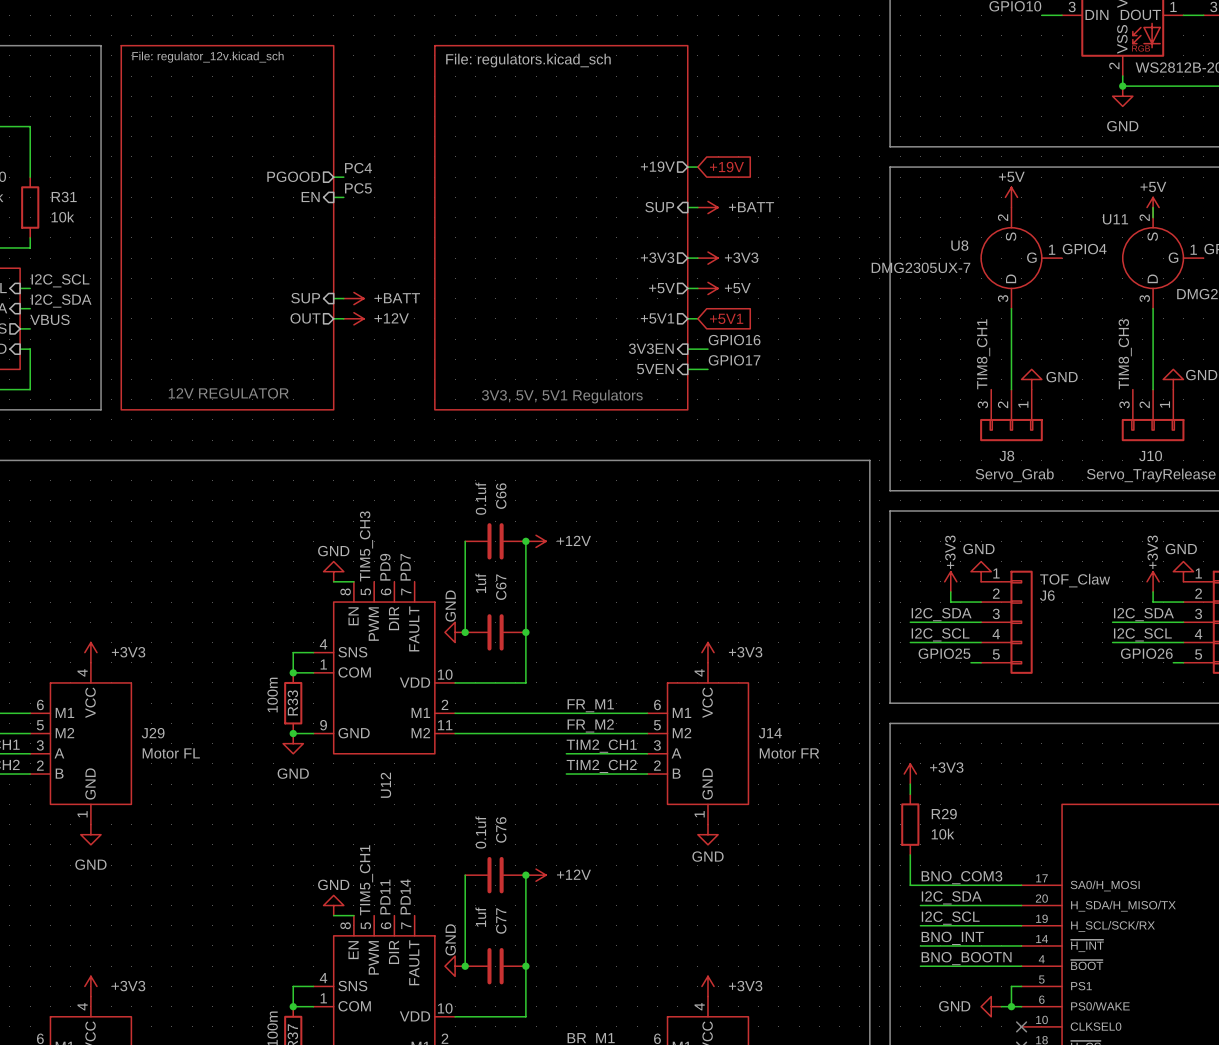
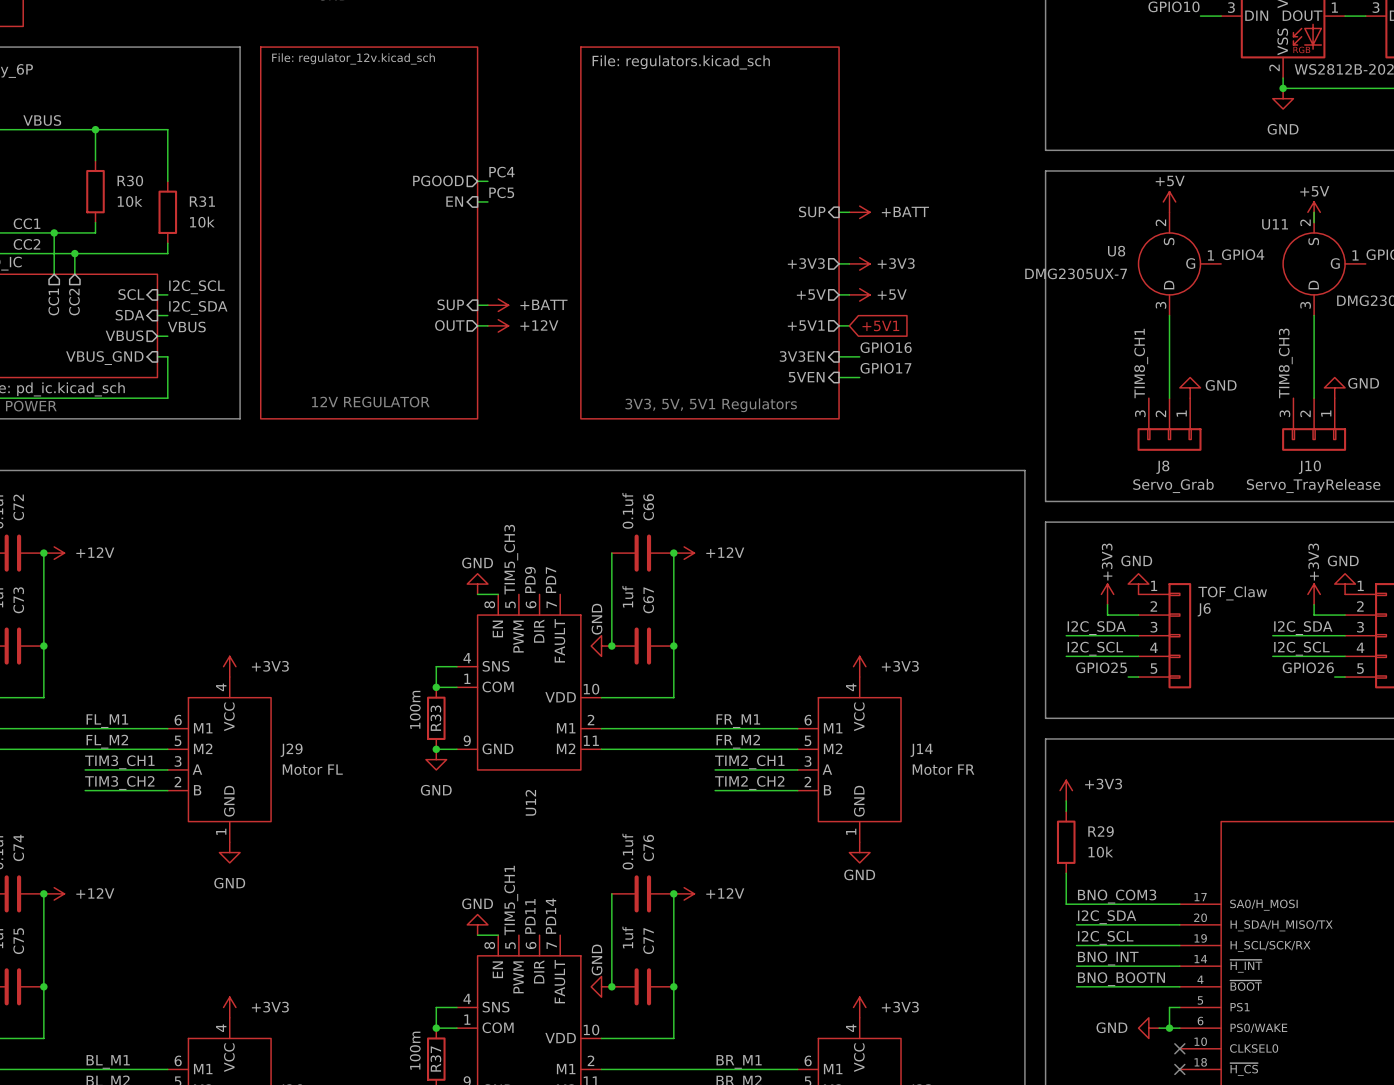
sheet pin: +19V (657, 166) -> none
wire: (687, 167) (697, 167) -> none
global label: +19V (726, 167) -> none

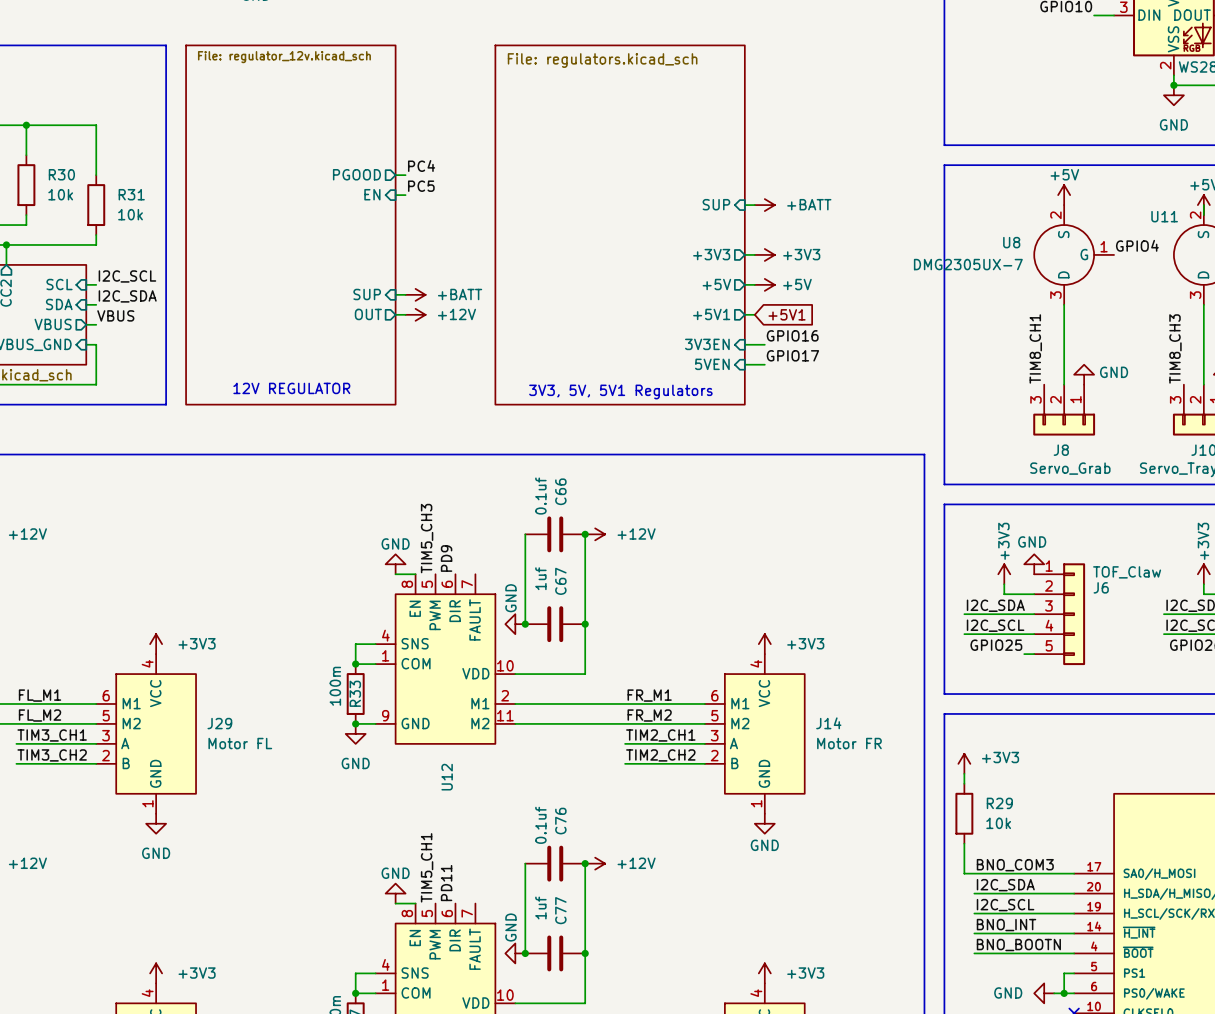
label: PD7 (551, 580) -> none
label: PD14 (551, 916) -> none

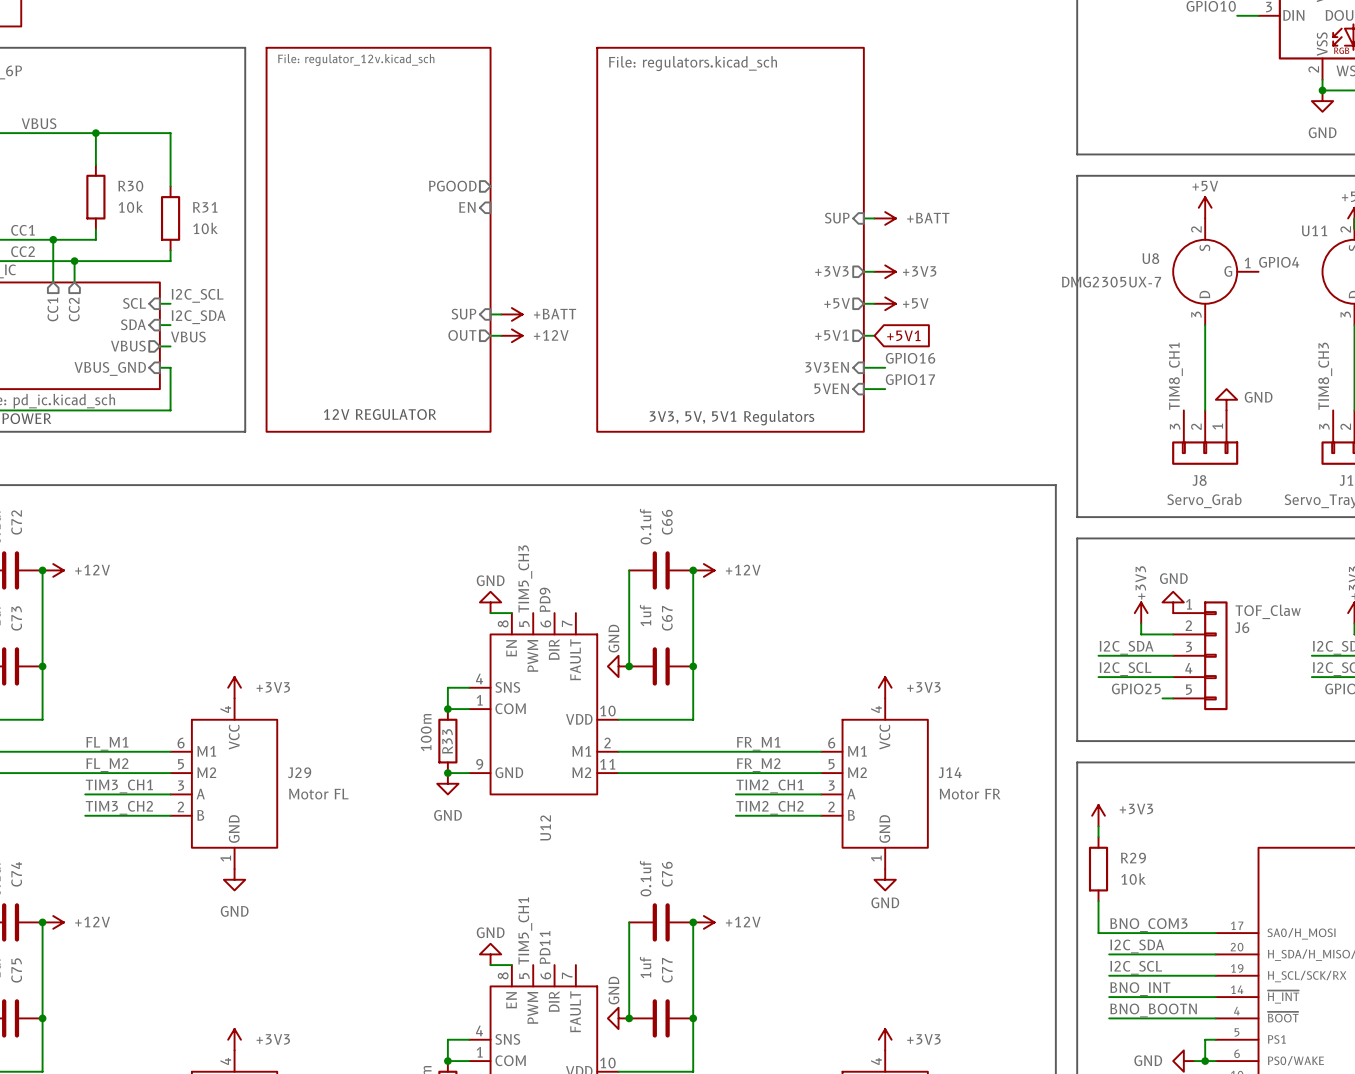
label: PC4 (421, 165) -> none
wire: (395, 175) (405, 175) -> none
label: PC5 (421, 186) -> none
wire: (395, 195) (405, 195) -> none

